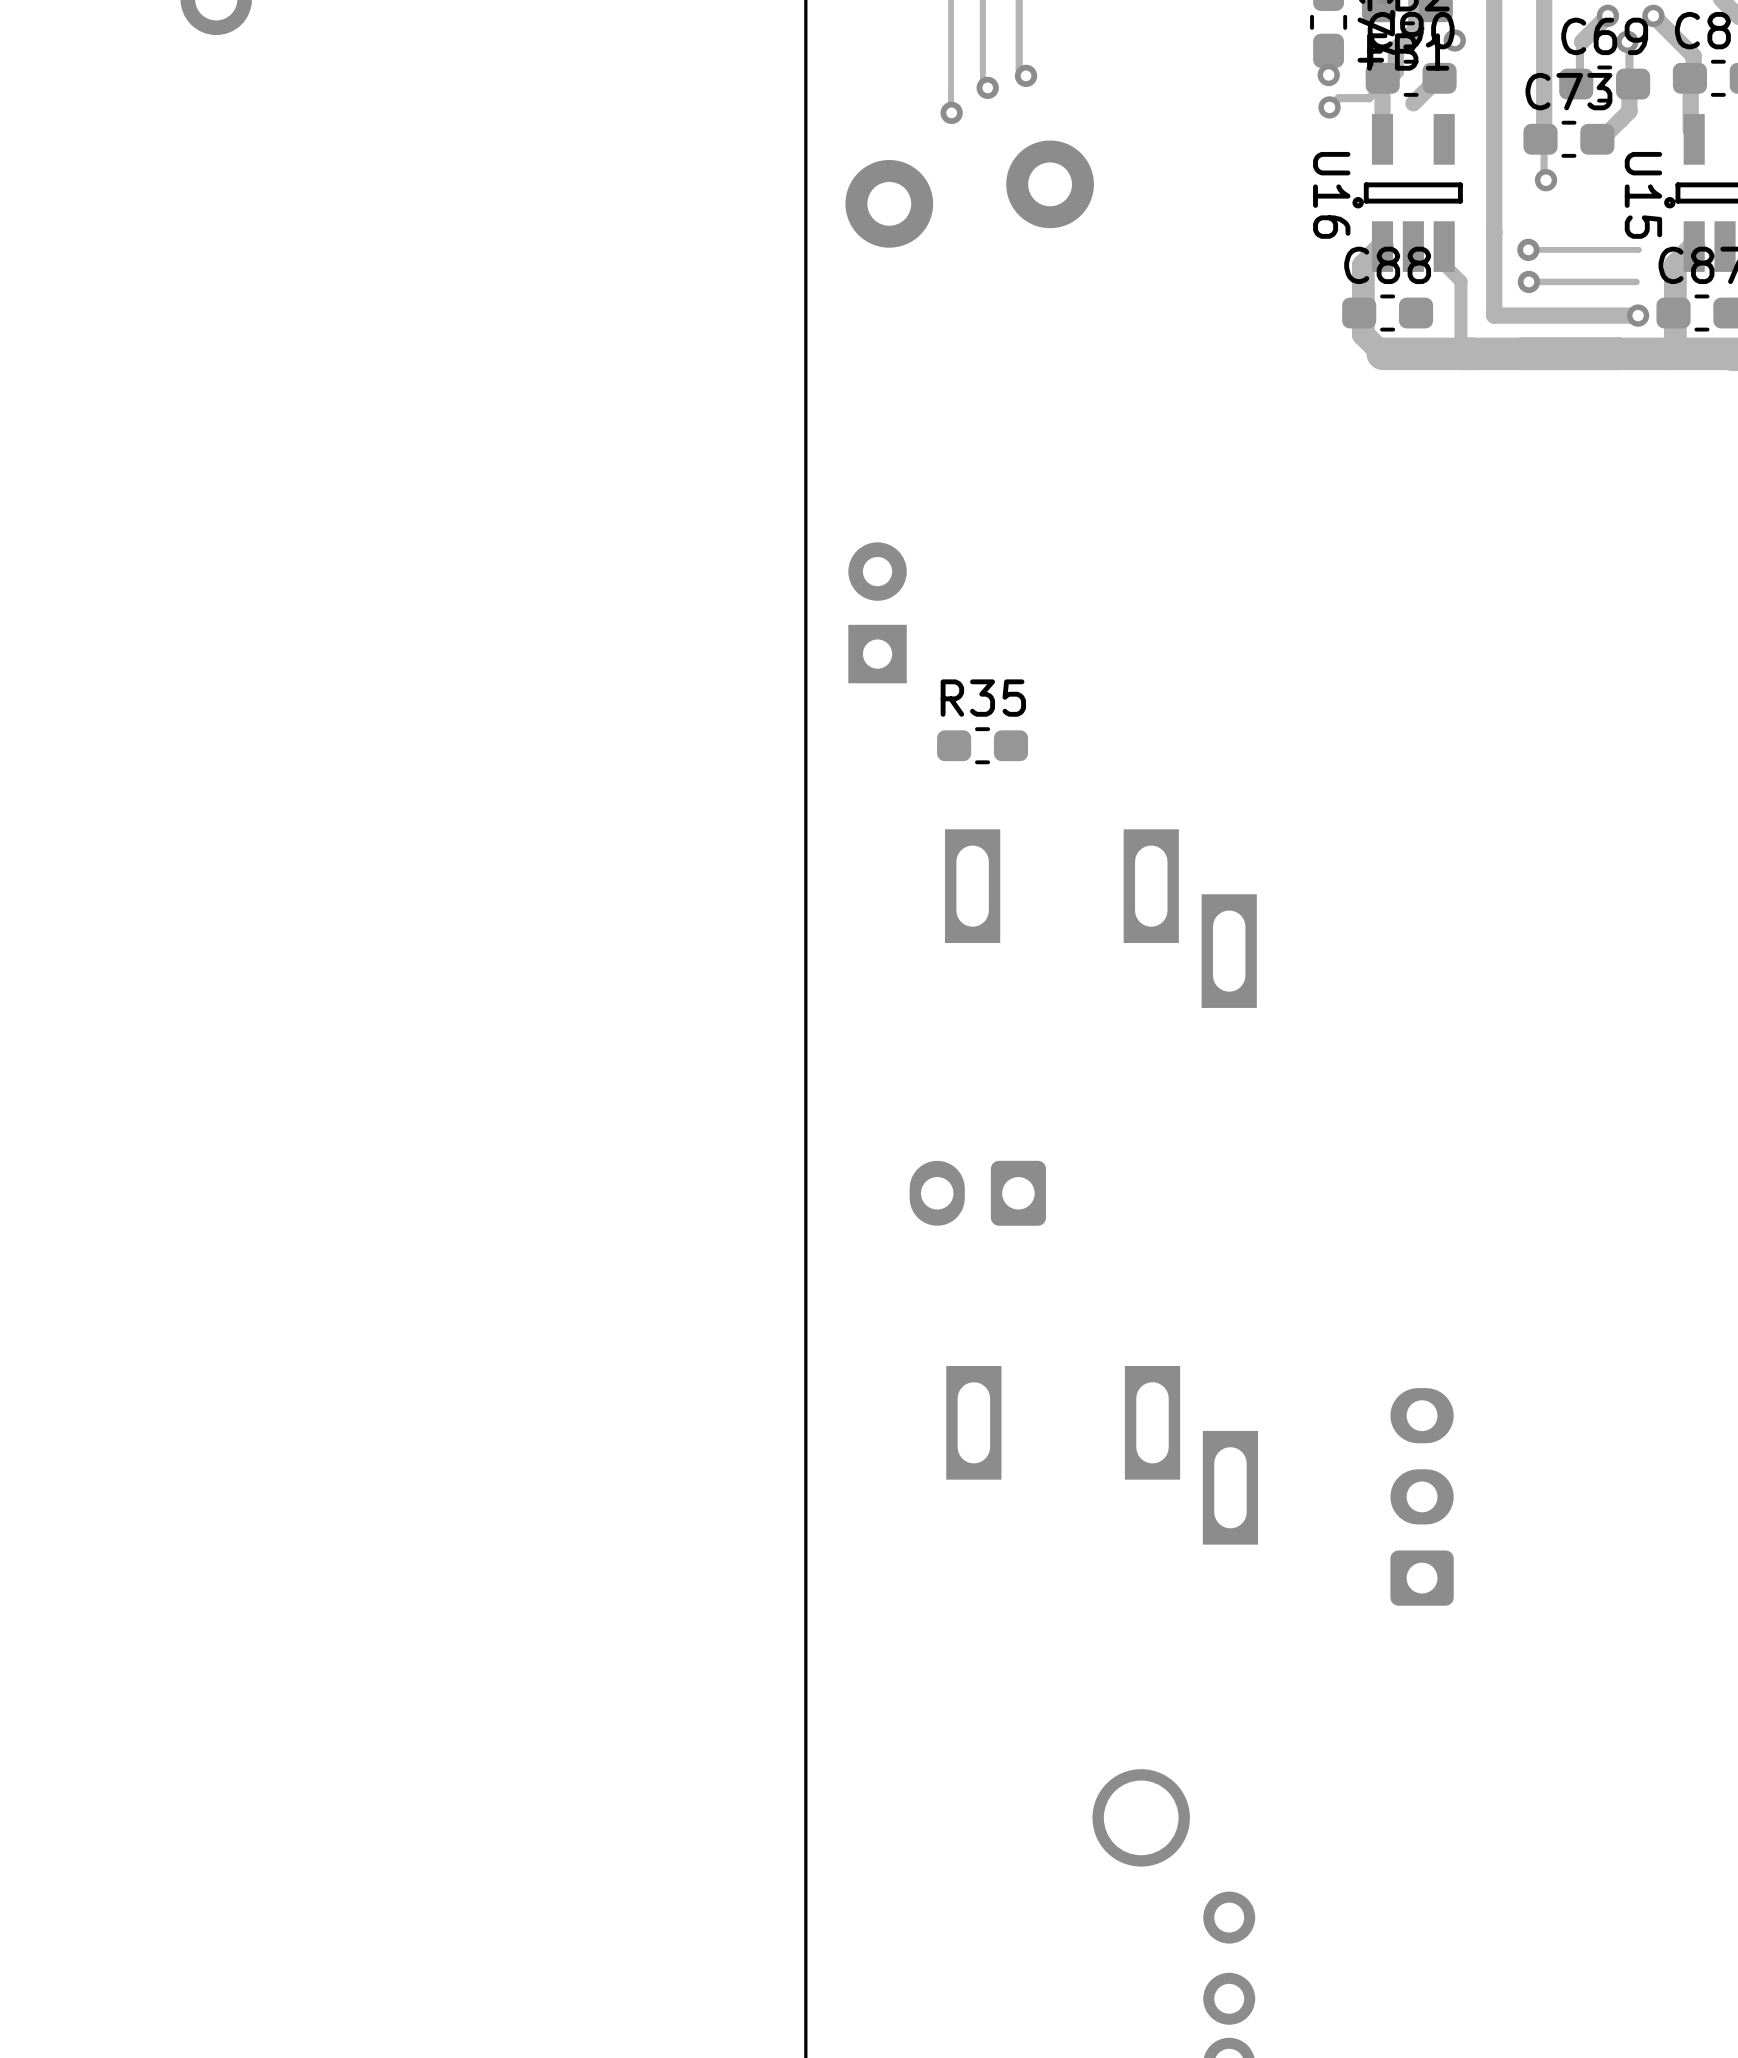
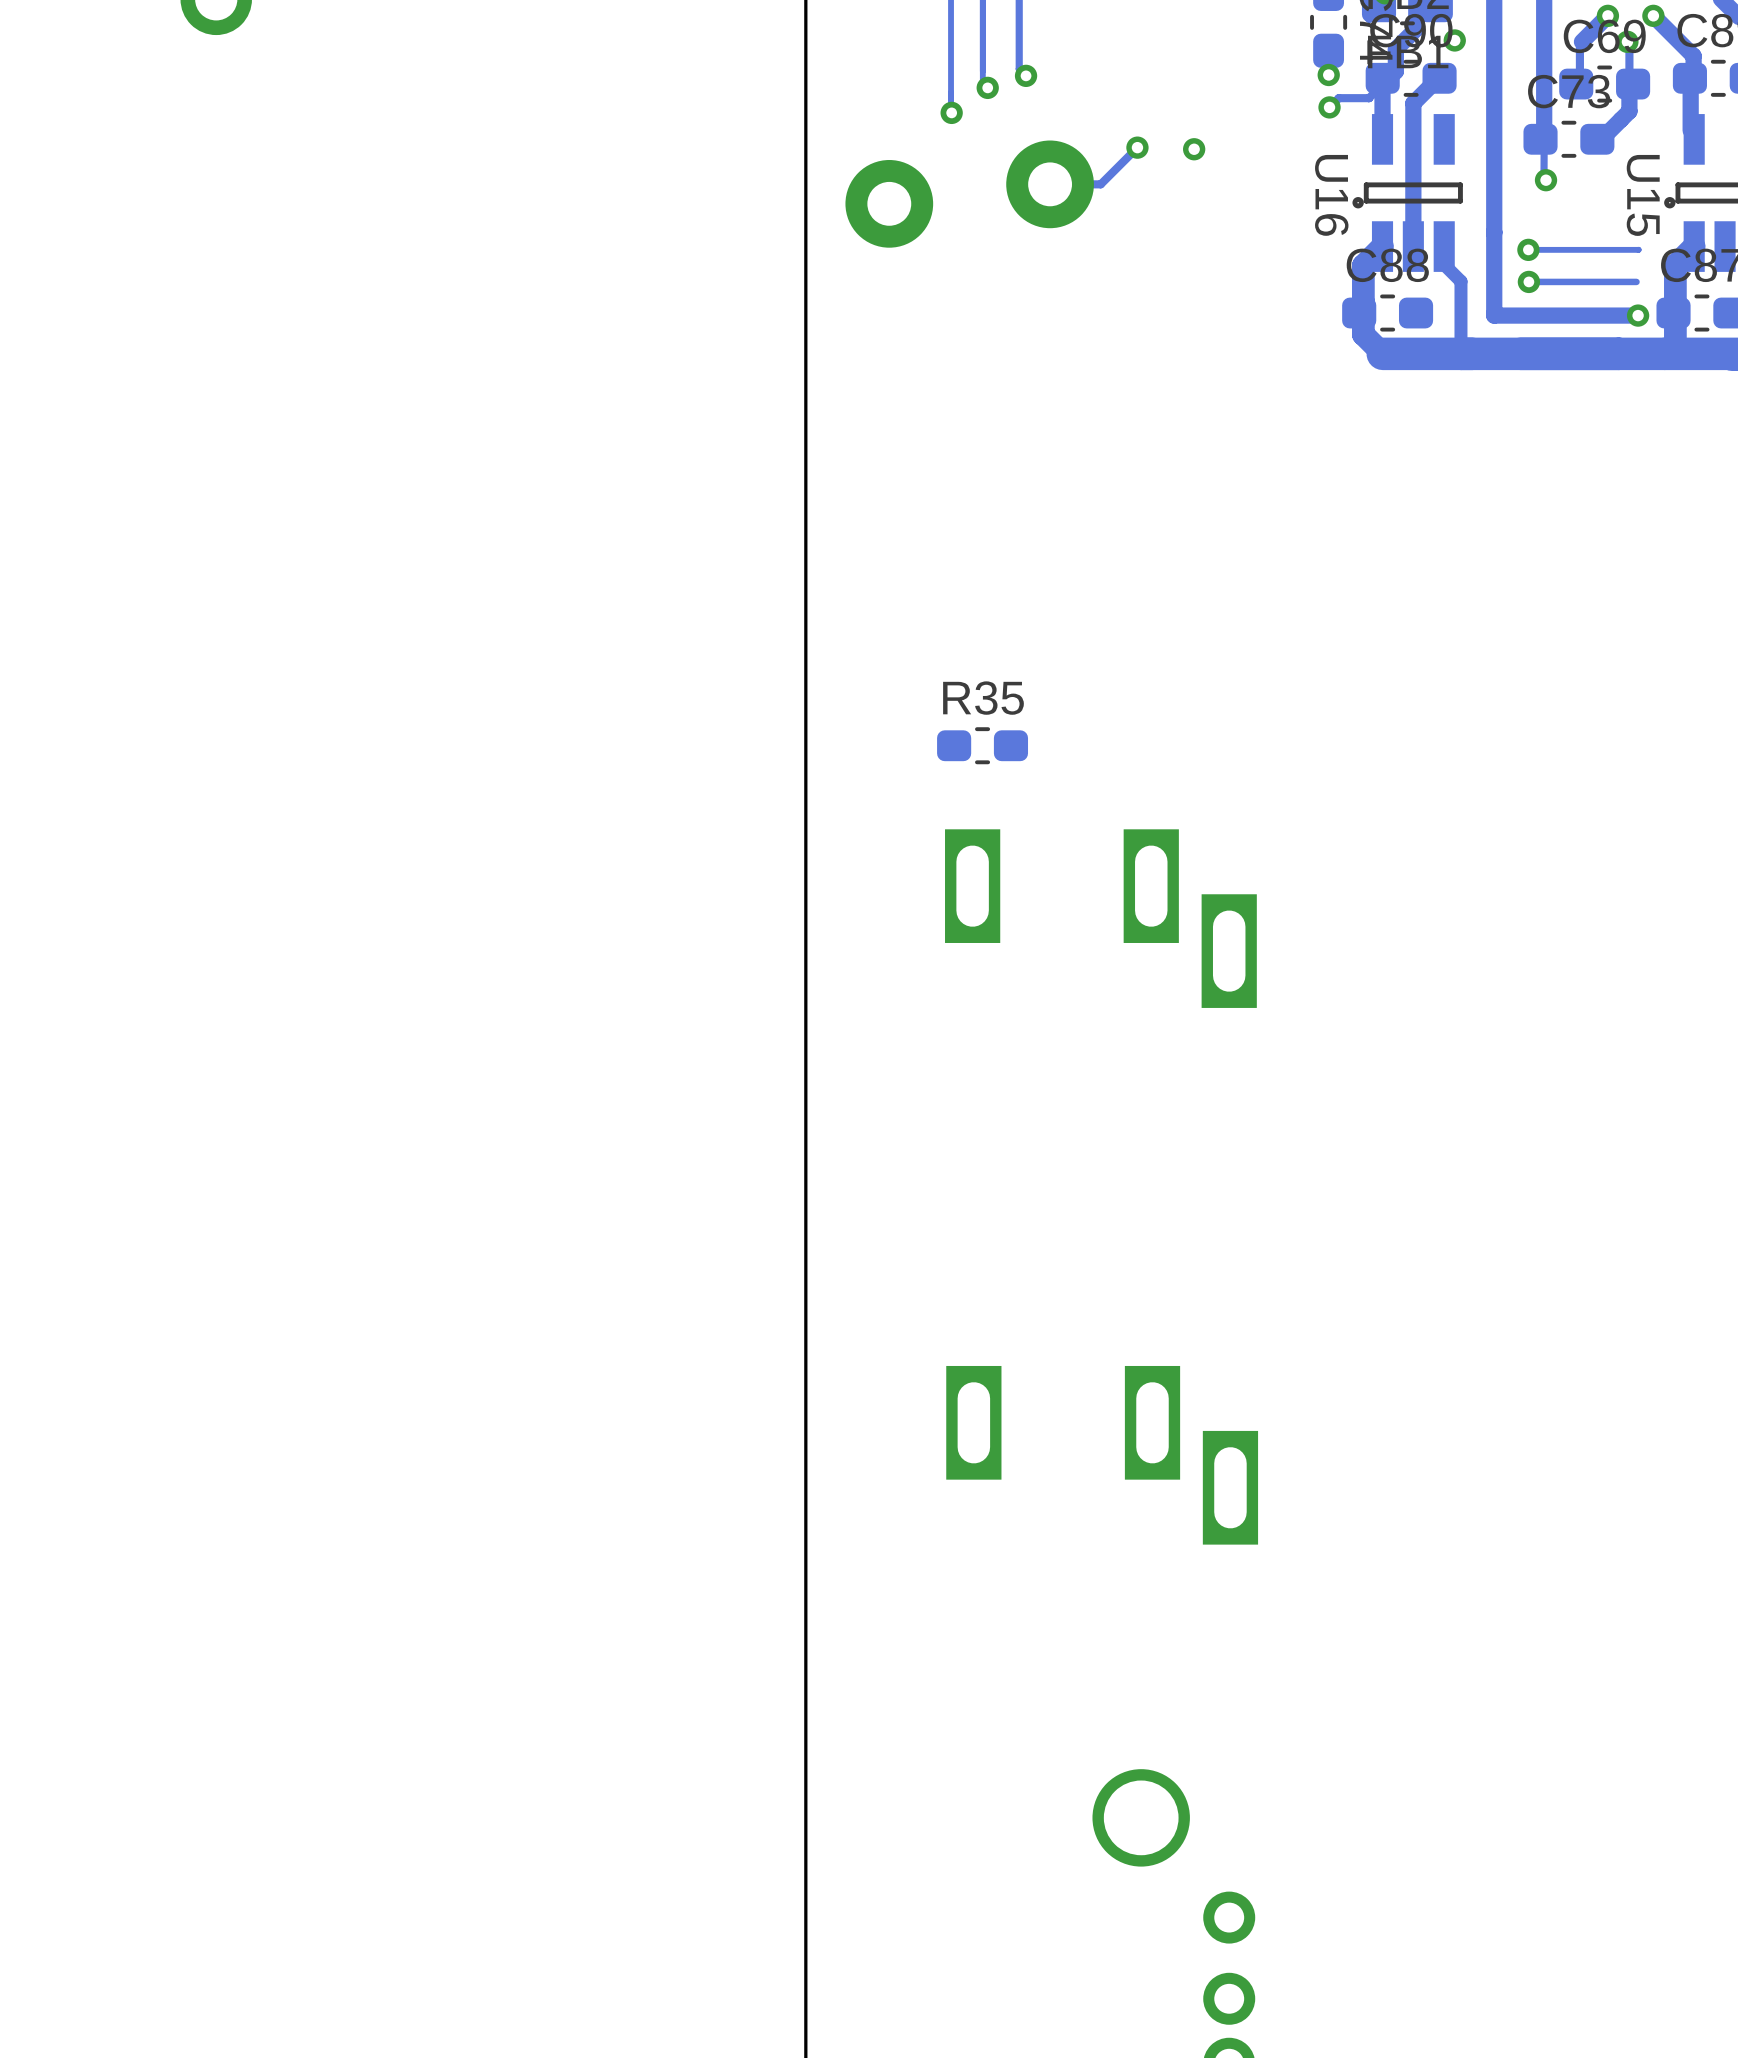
track: none -> (1413, 103) (1413, 246)
track: none -> (1137, 147) (1100, 184) (1050, 184)
via: none -> (1137, 147)
via: none -> (1194, 149)
part: (877, 612) -> none
part: (977, 1193) -> none
part: (1422, 1496) -> none

